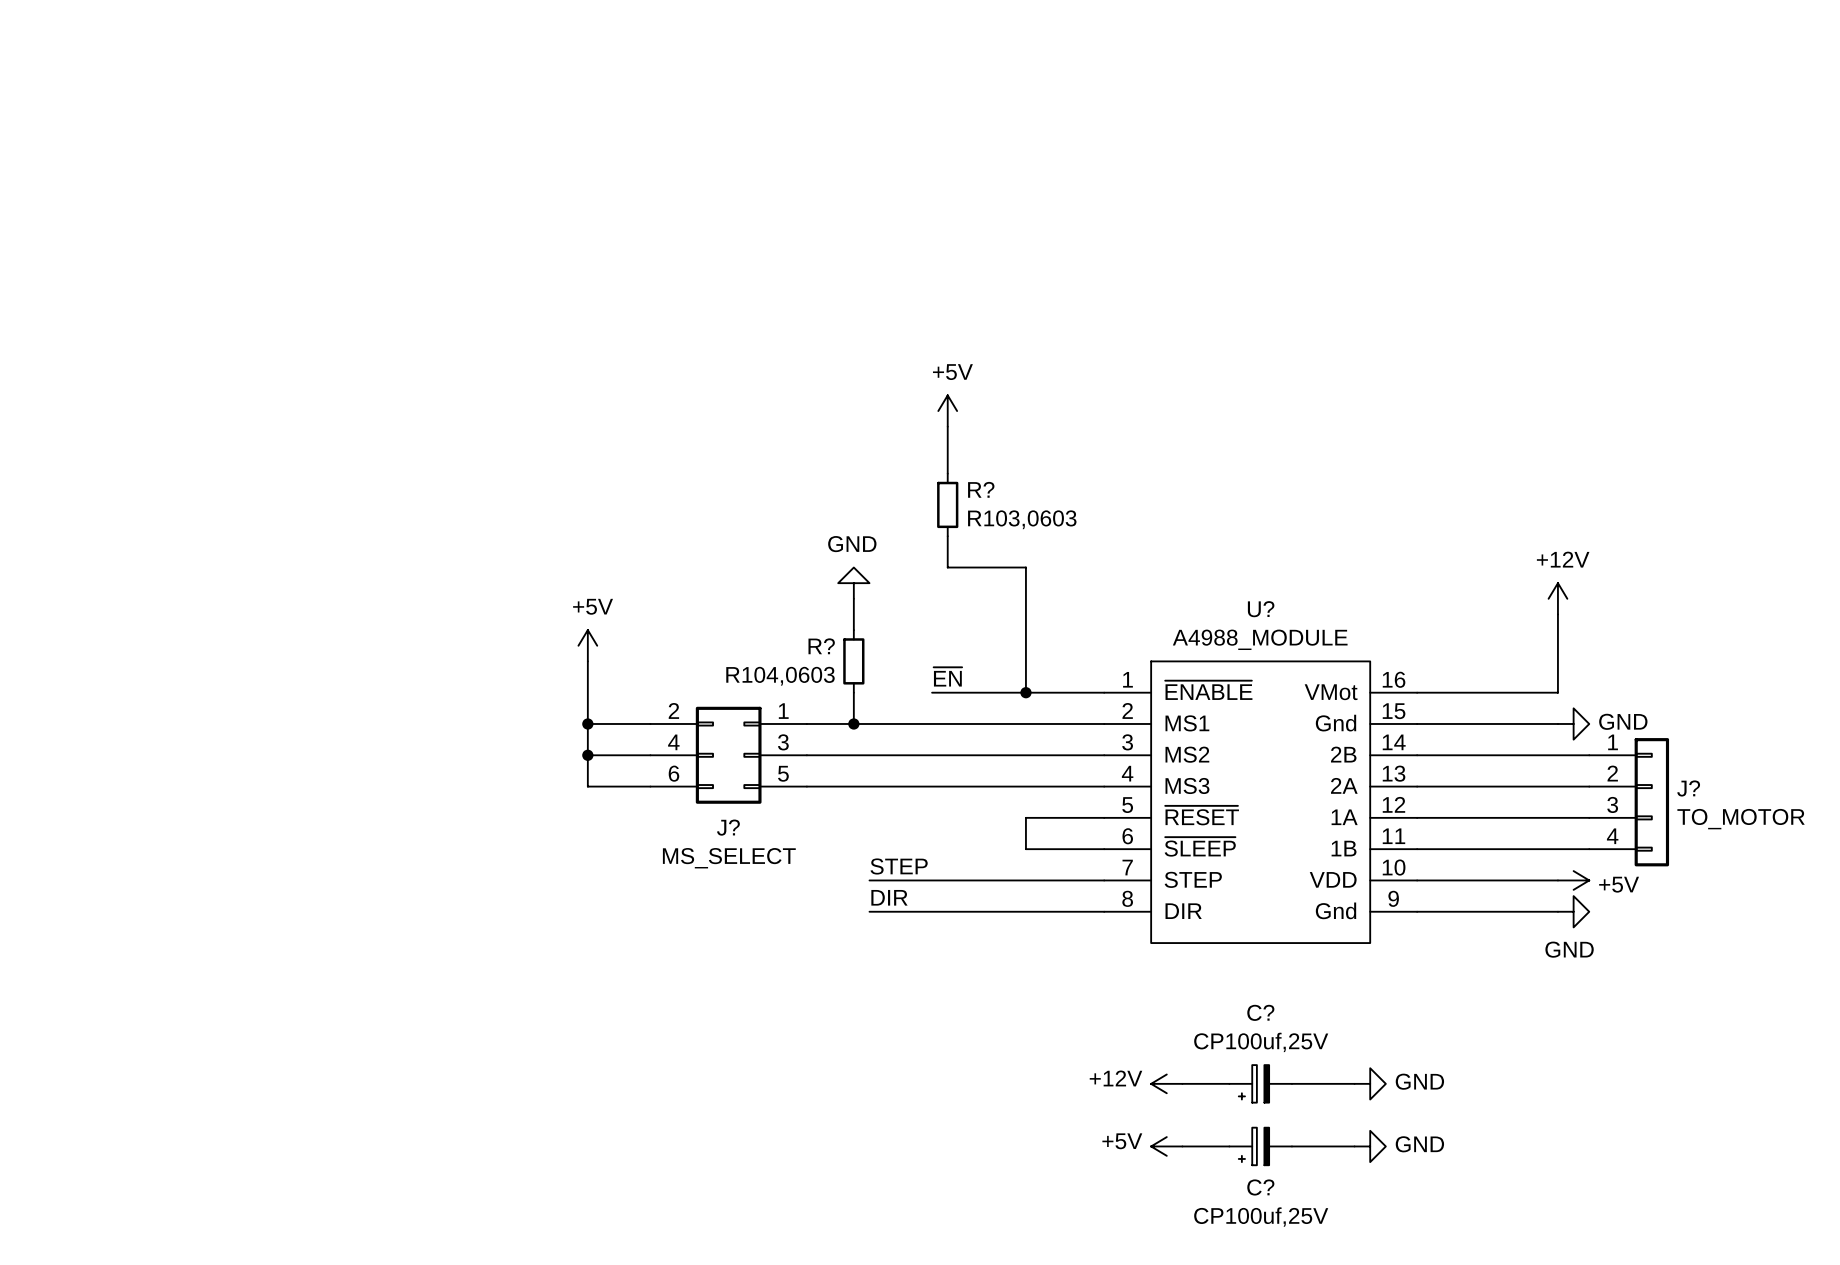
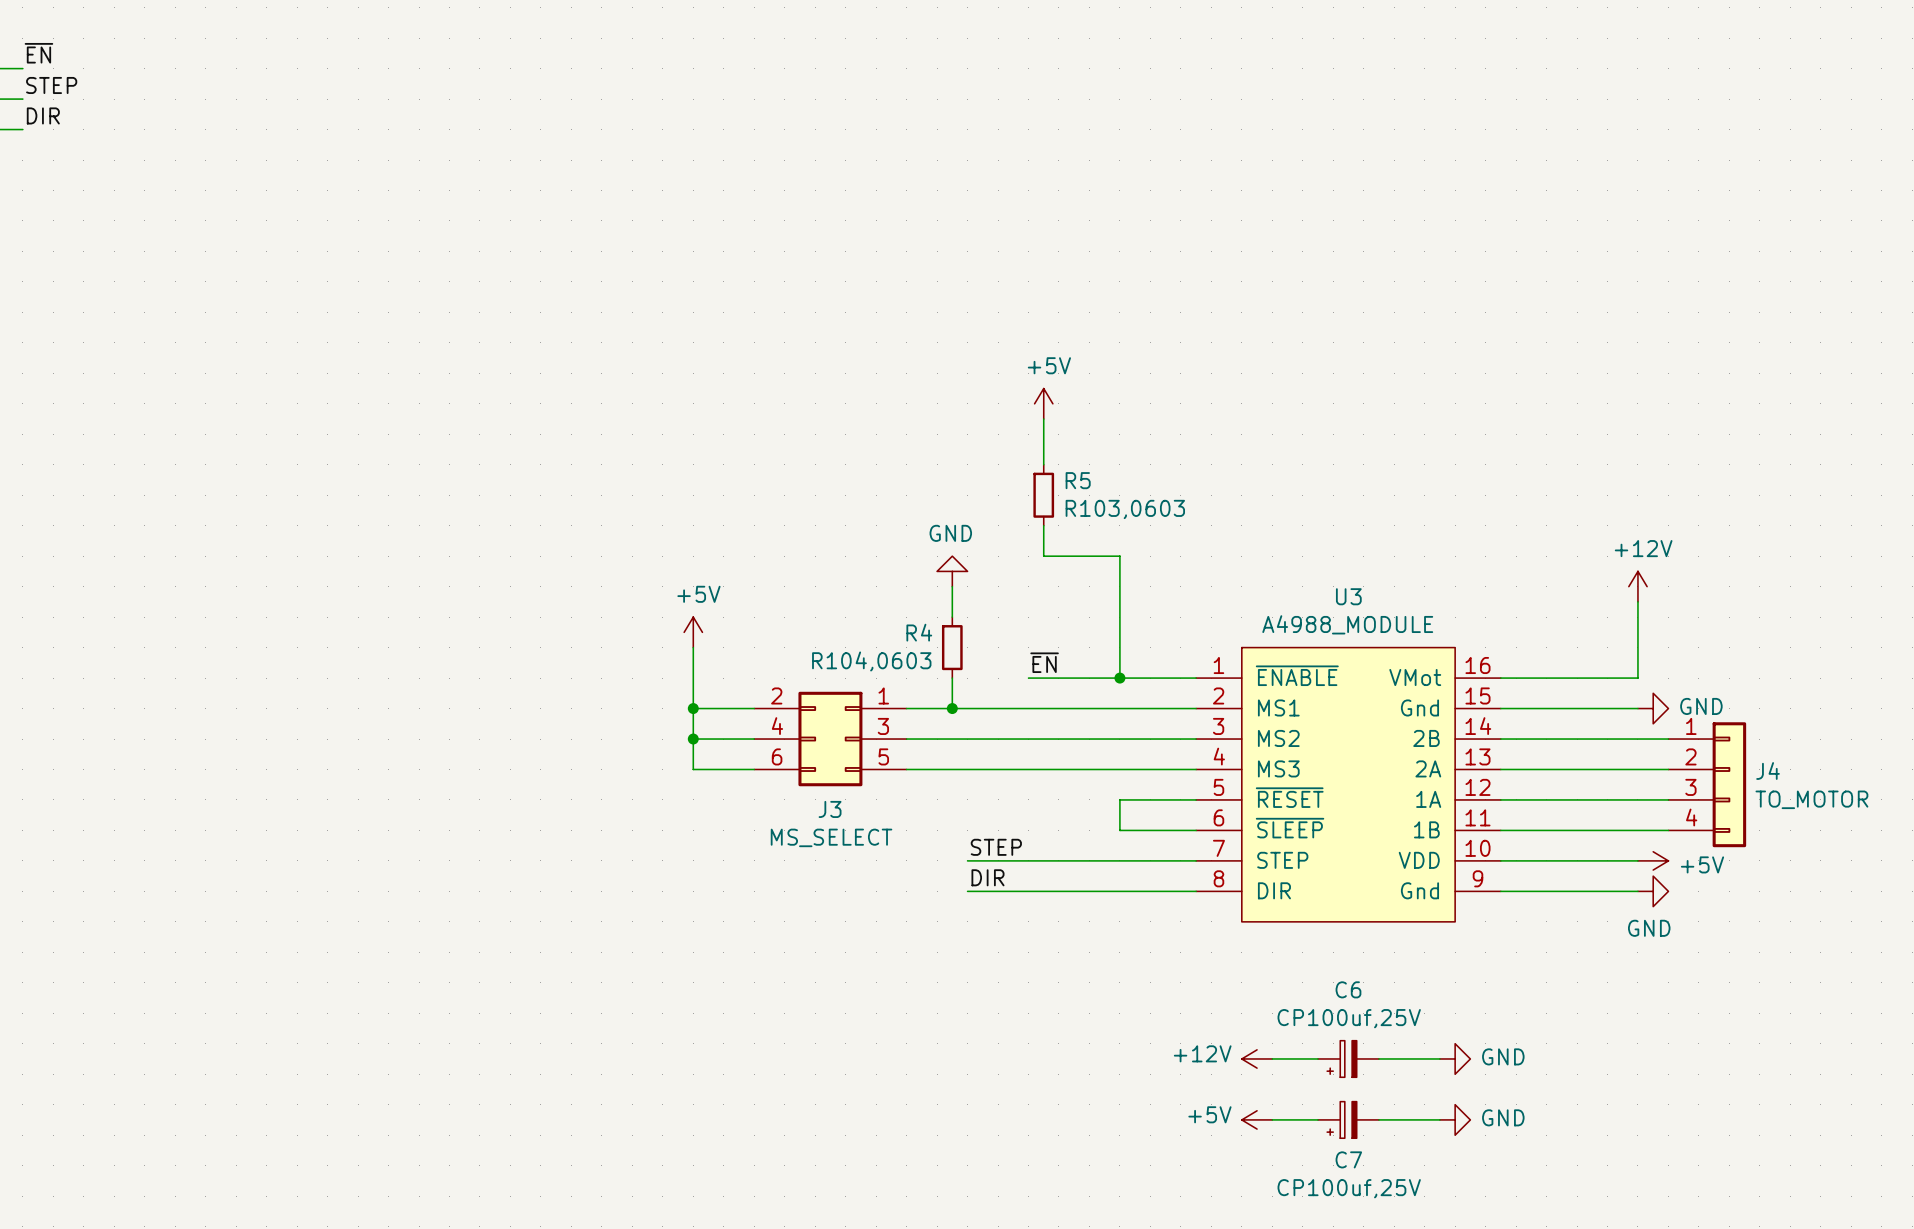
R? name: R? (981, 489) -> R5 (1078, 480)
U? name: U? (1261, 609) -> U3 (1348, 596)
R? name: R? (821, 646) -> R4 (919, 632)
J? name: J? (1688, 788) -> J4 (1768, 770)
J? name: J? (728, 827) -> J3 (830, 809)
C? name: C? (1260, 1012) -> C6 (1348, 989)
C? name: C? (1260, 1187) -> C7 (1348, 1159)

